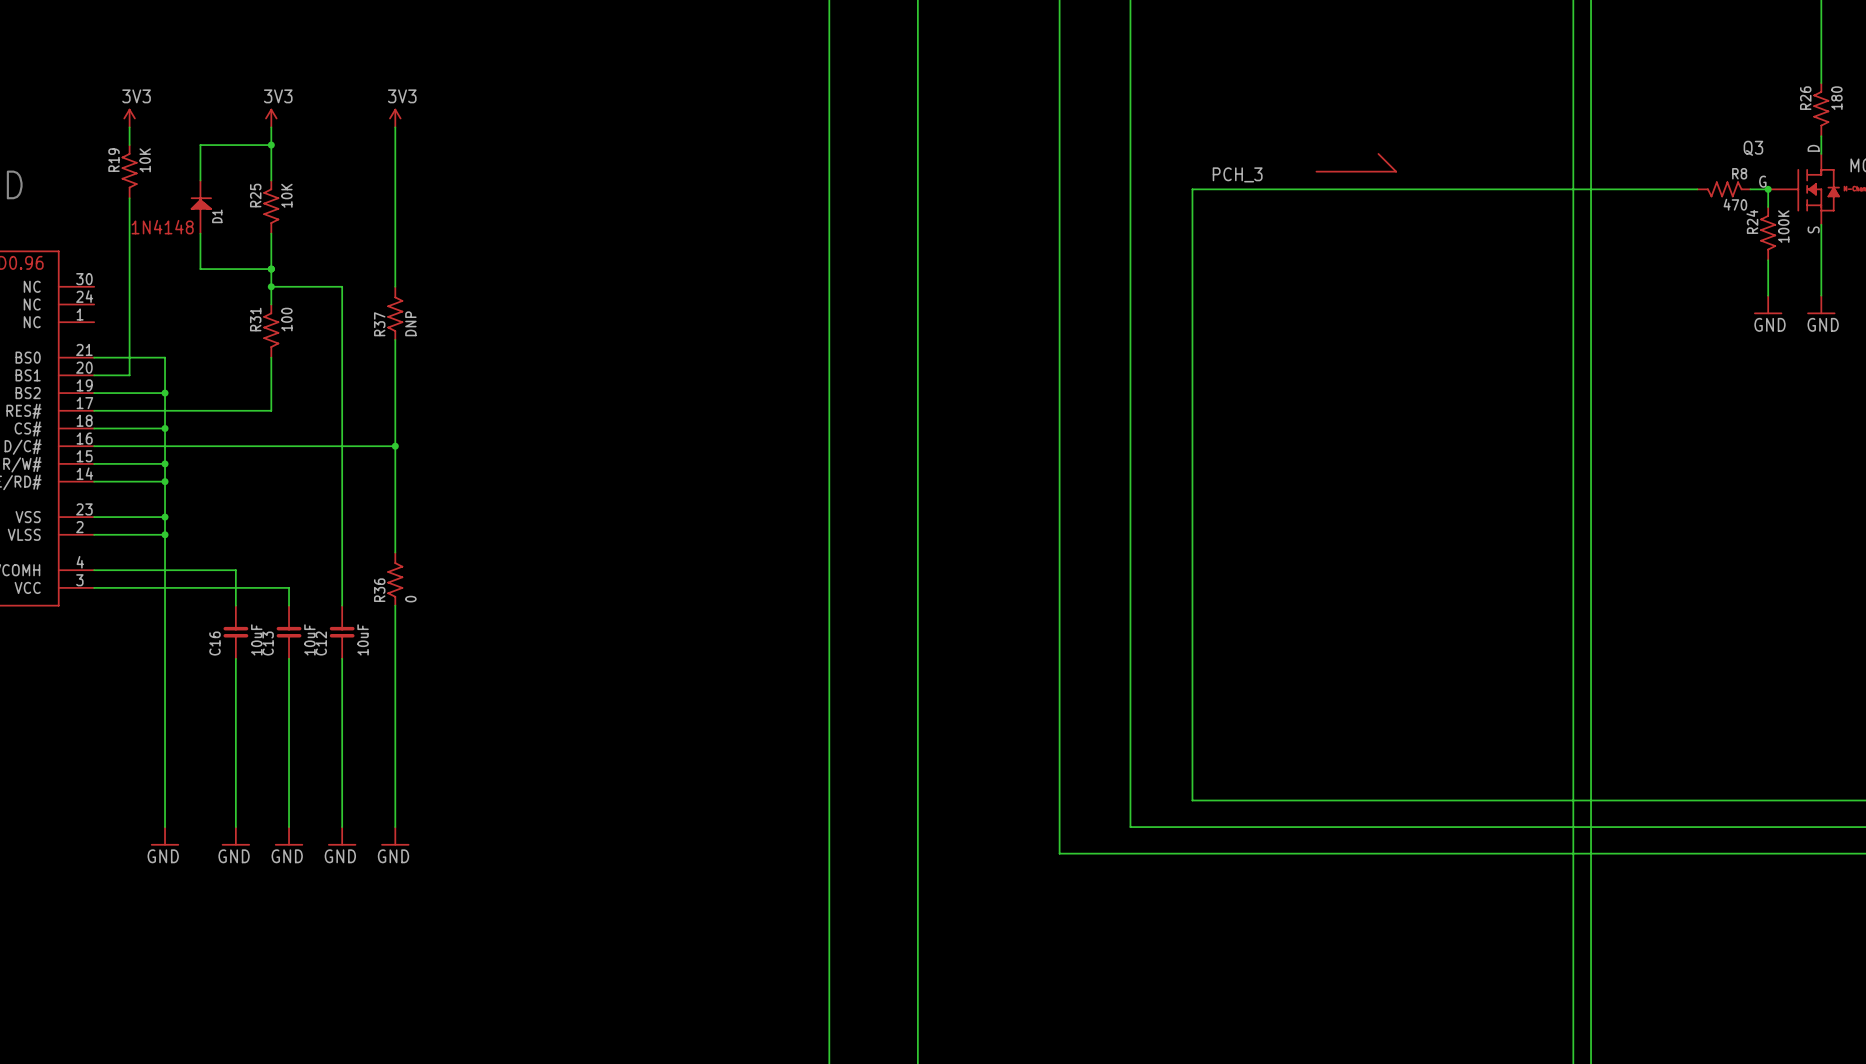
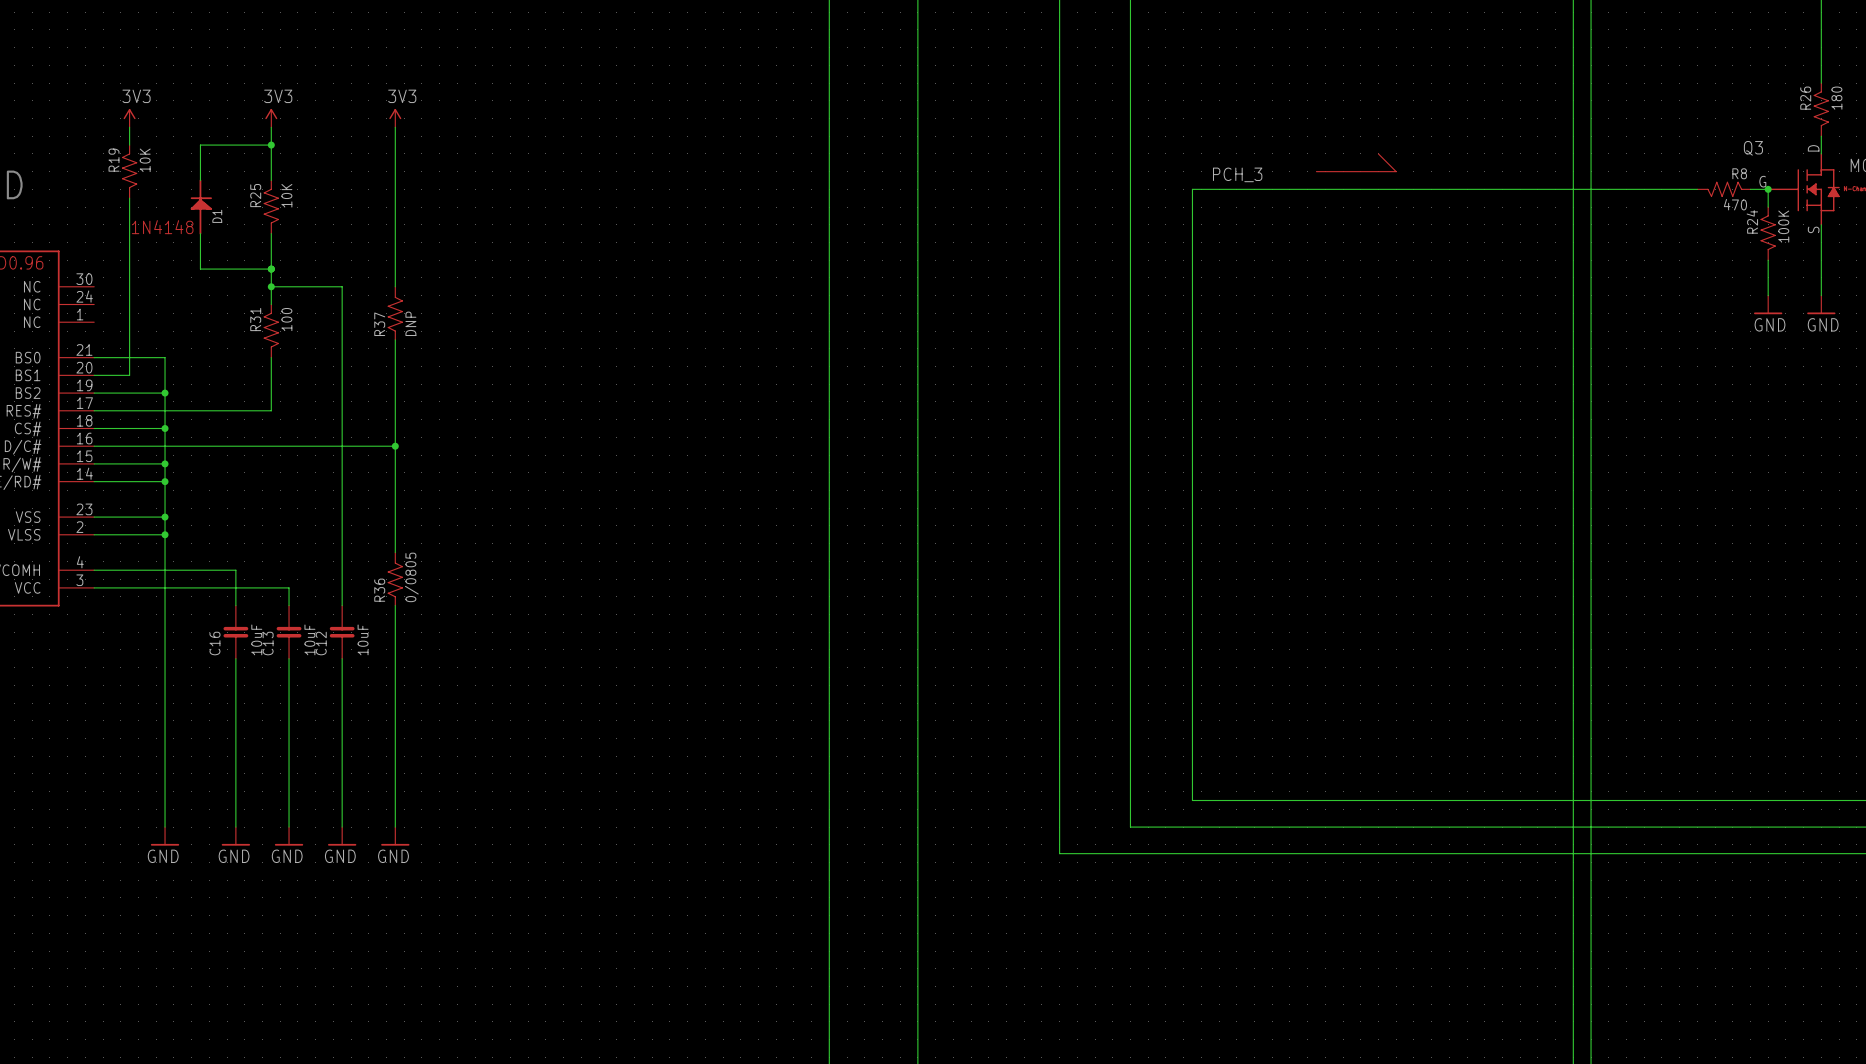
R36 value: 0 (410, 599) -> 0/0805 (411, 577)

